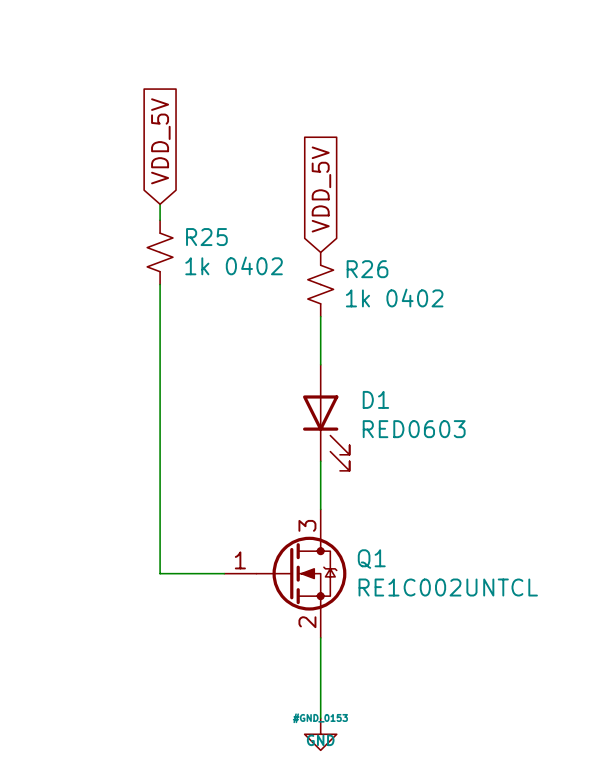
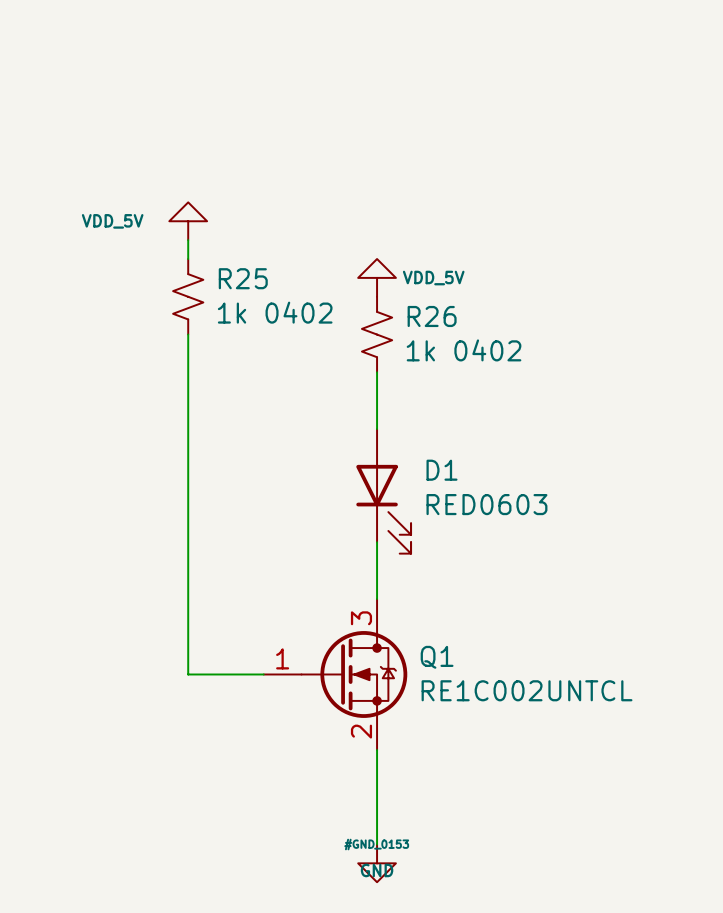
global label: VDD_5V (160, 141) -> none
power symbol: none -> VDD_5V (188, 221)
global label: VDD_5V (321, 189) -> none
power symbol: none -> VDD_5V (377, 277)

